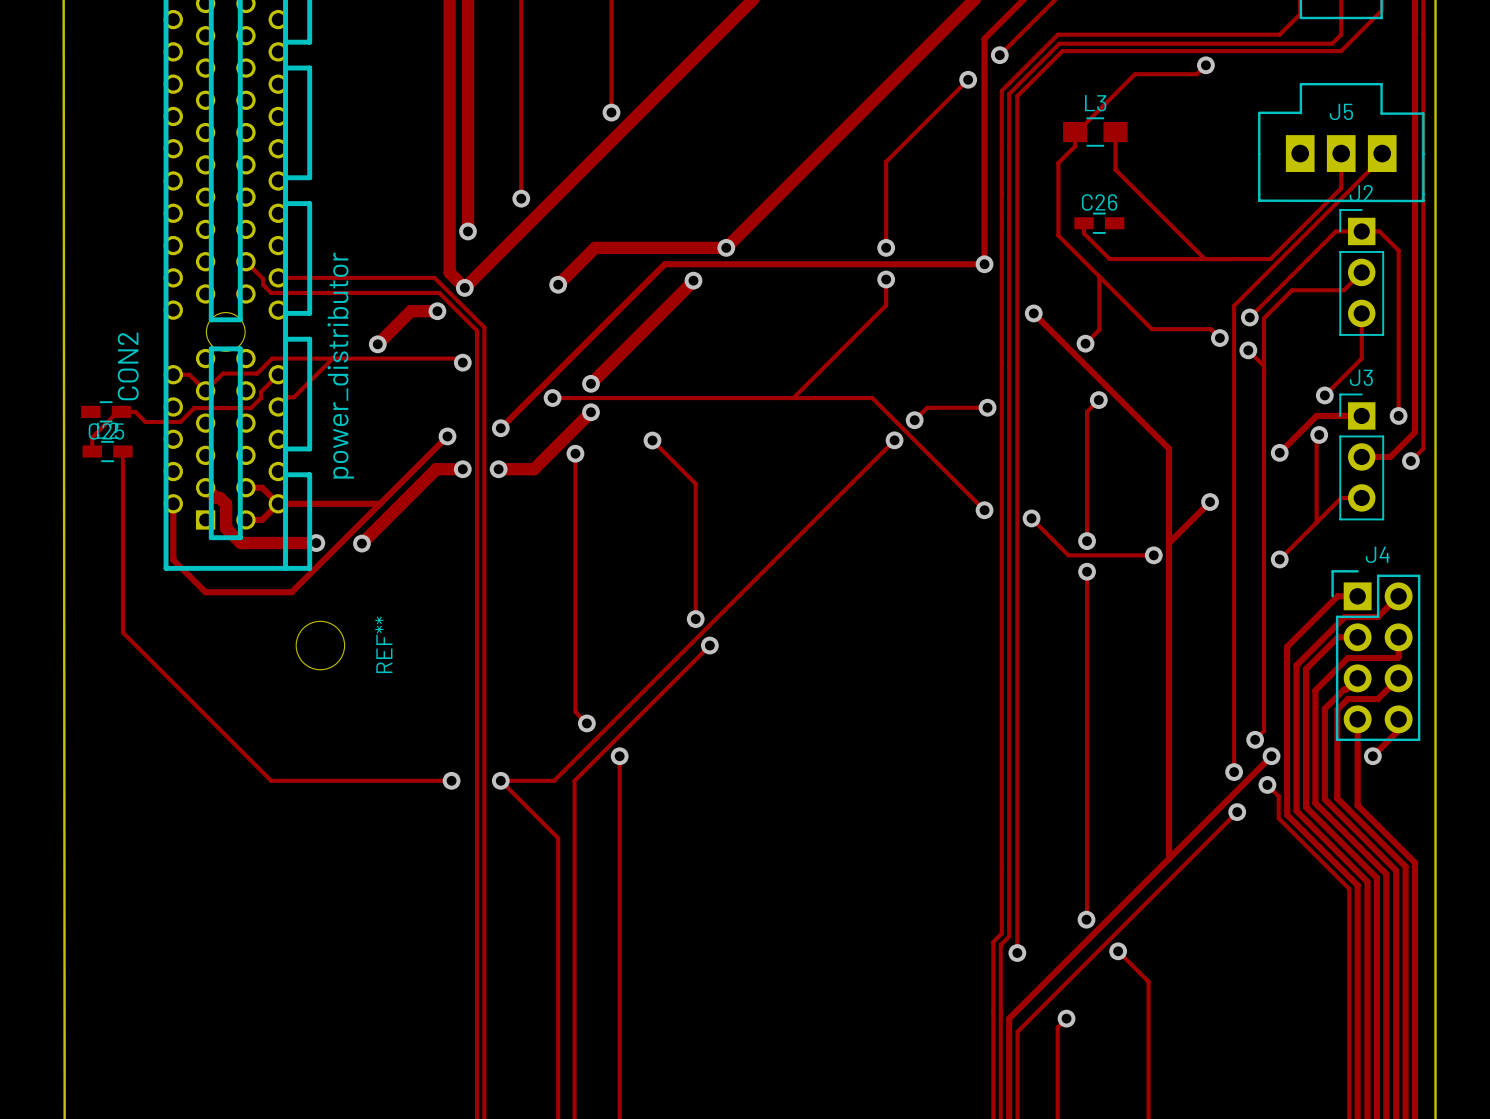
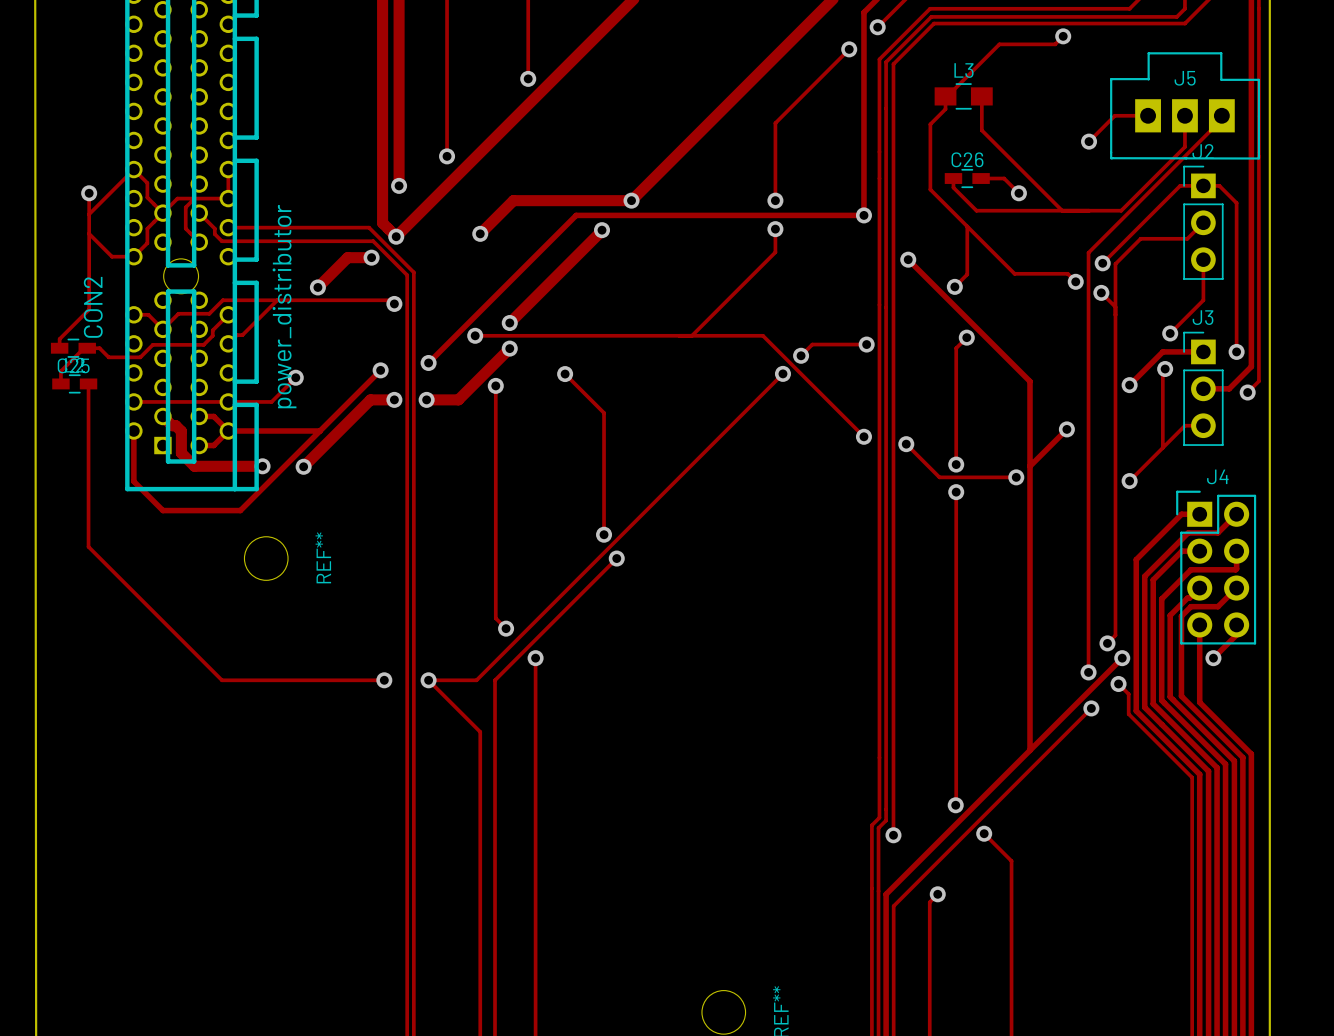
track: none -> (1148, 115) (1114, 115) (1089, 141)
via: none -> (1089, 141)
track: none -> (228, 169) (228, 198) (177, 198) (147, 228) (147, 243) (133, 256) (111, 256) (89, 233)
track: none -> (981, 178) (1004, 178) (1018, 193)
track: none -> (89, 193) (89, 309) (59, 339) (59, 348)
via: none -> (89, 193)
via: none -> (1018, 193)
track: none -> (194, 198) (185, 207) (185, 228) (199, 242)
track: none -> (162, 213) (147, 197) (147, 183) (133, 169) (89, 214)
track: none -> (295, 377) (271, 401) (133, 401)
via: none -> (295, 377)

